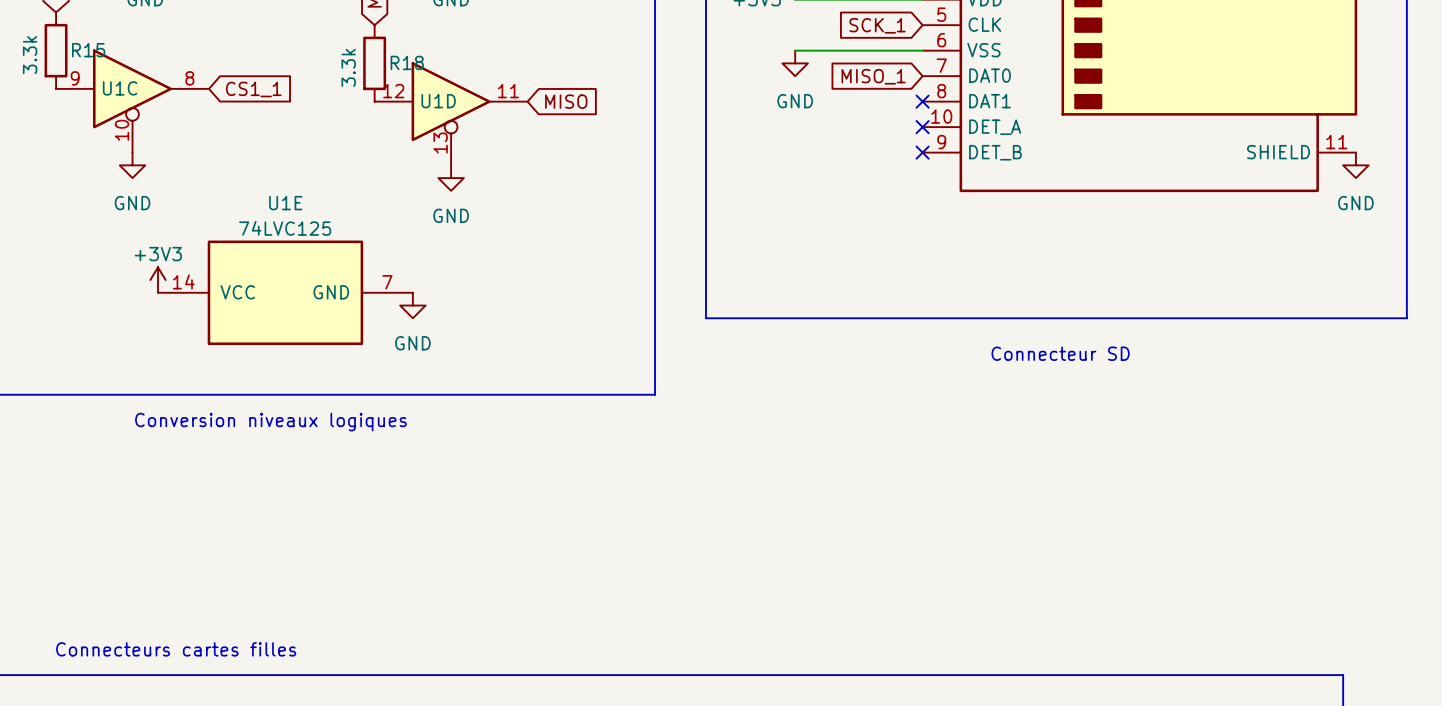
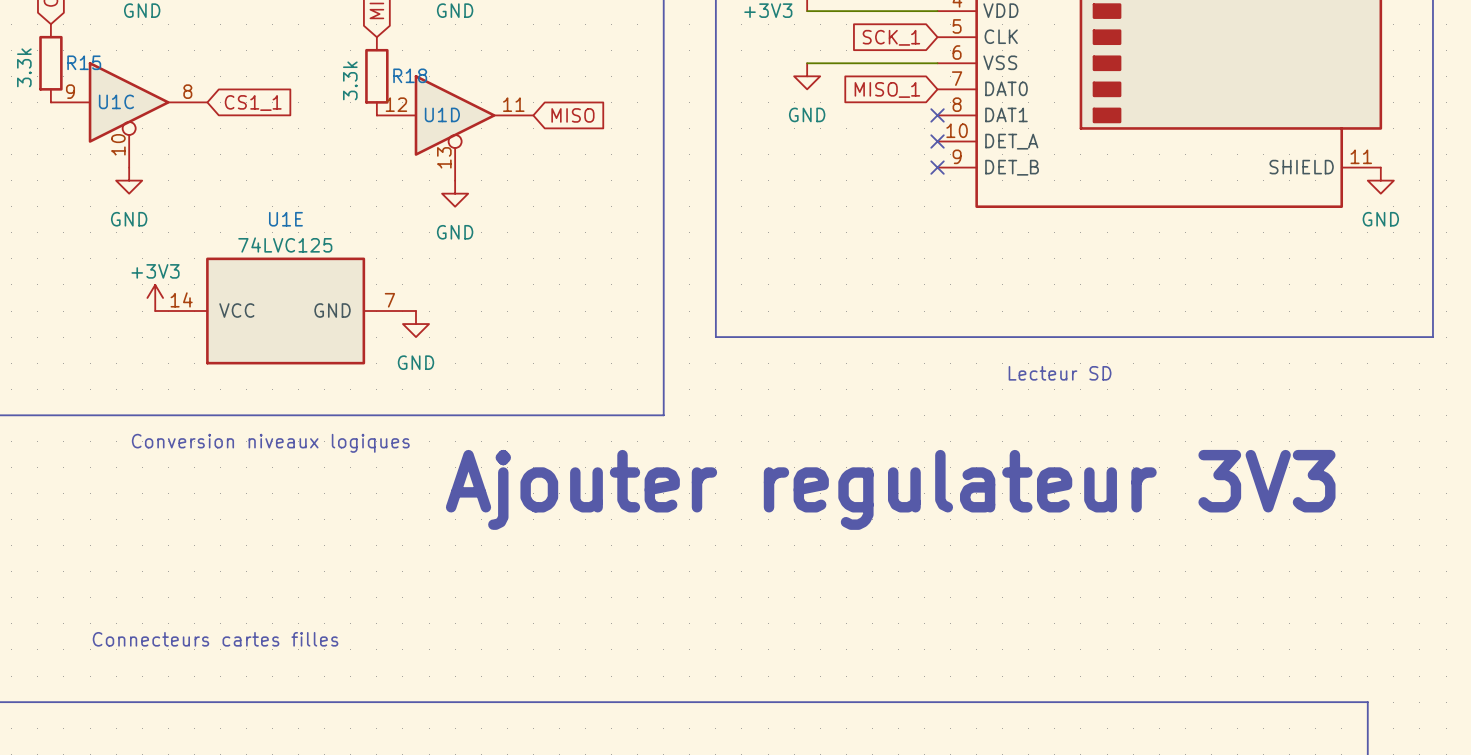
text: Connecteur SD (1060, 353) -> Lecteur SD (1060, 373)
text: none -> Ajouter regulateur 3V3 (890, 489)
text position: Connecteurs cartes filles (176, 649) -> Connecteurs cartes filles (215, 639)

